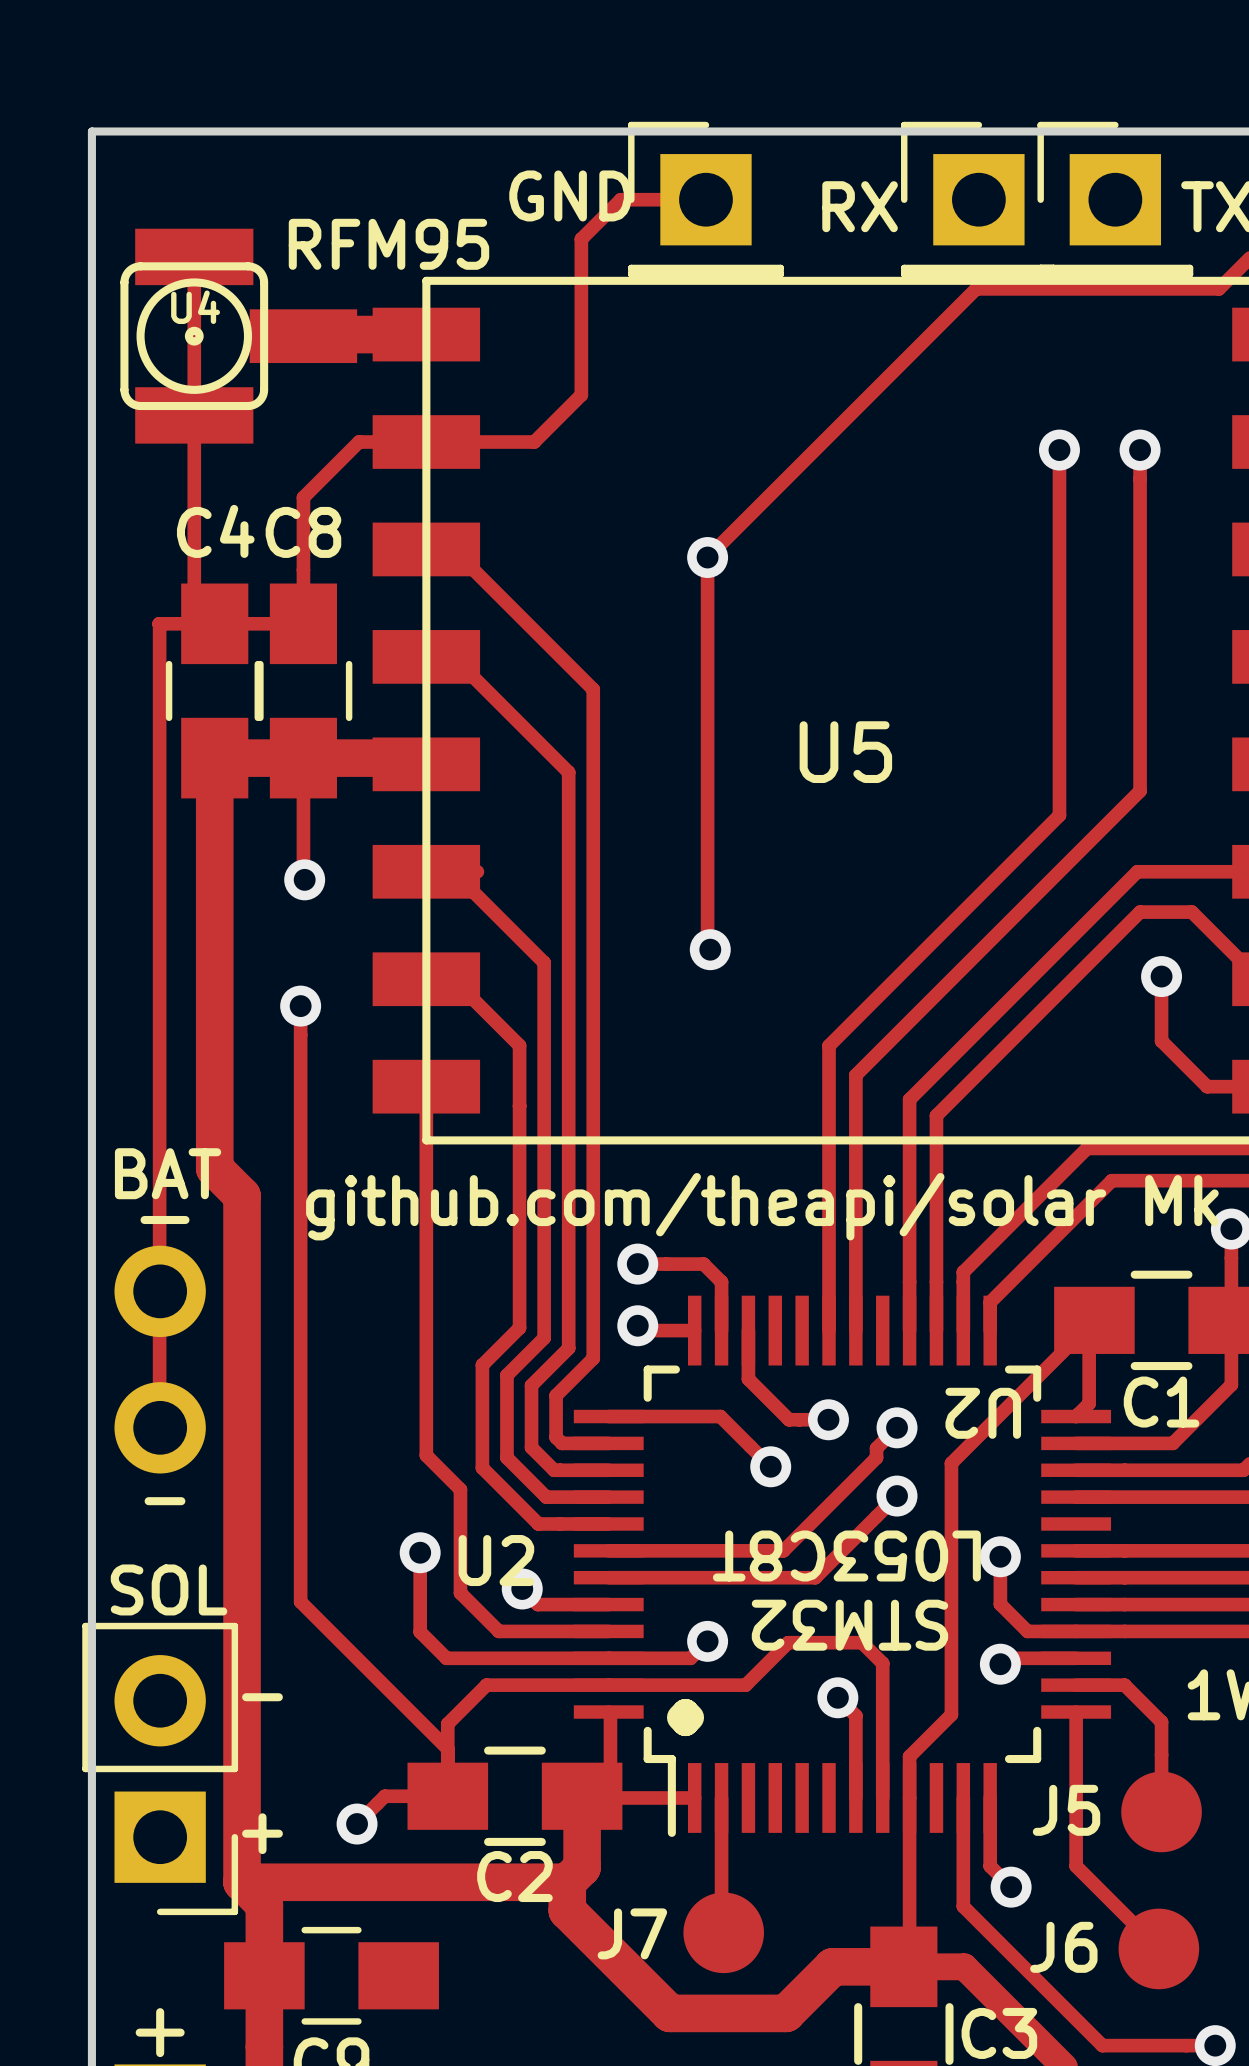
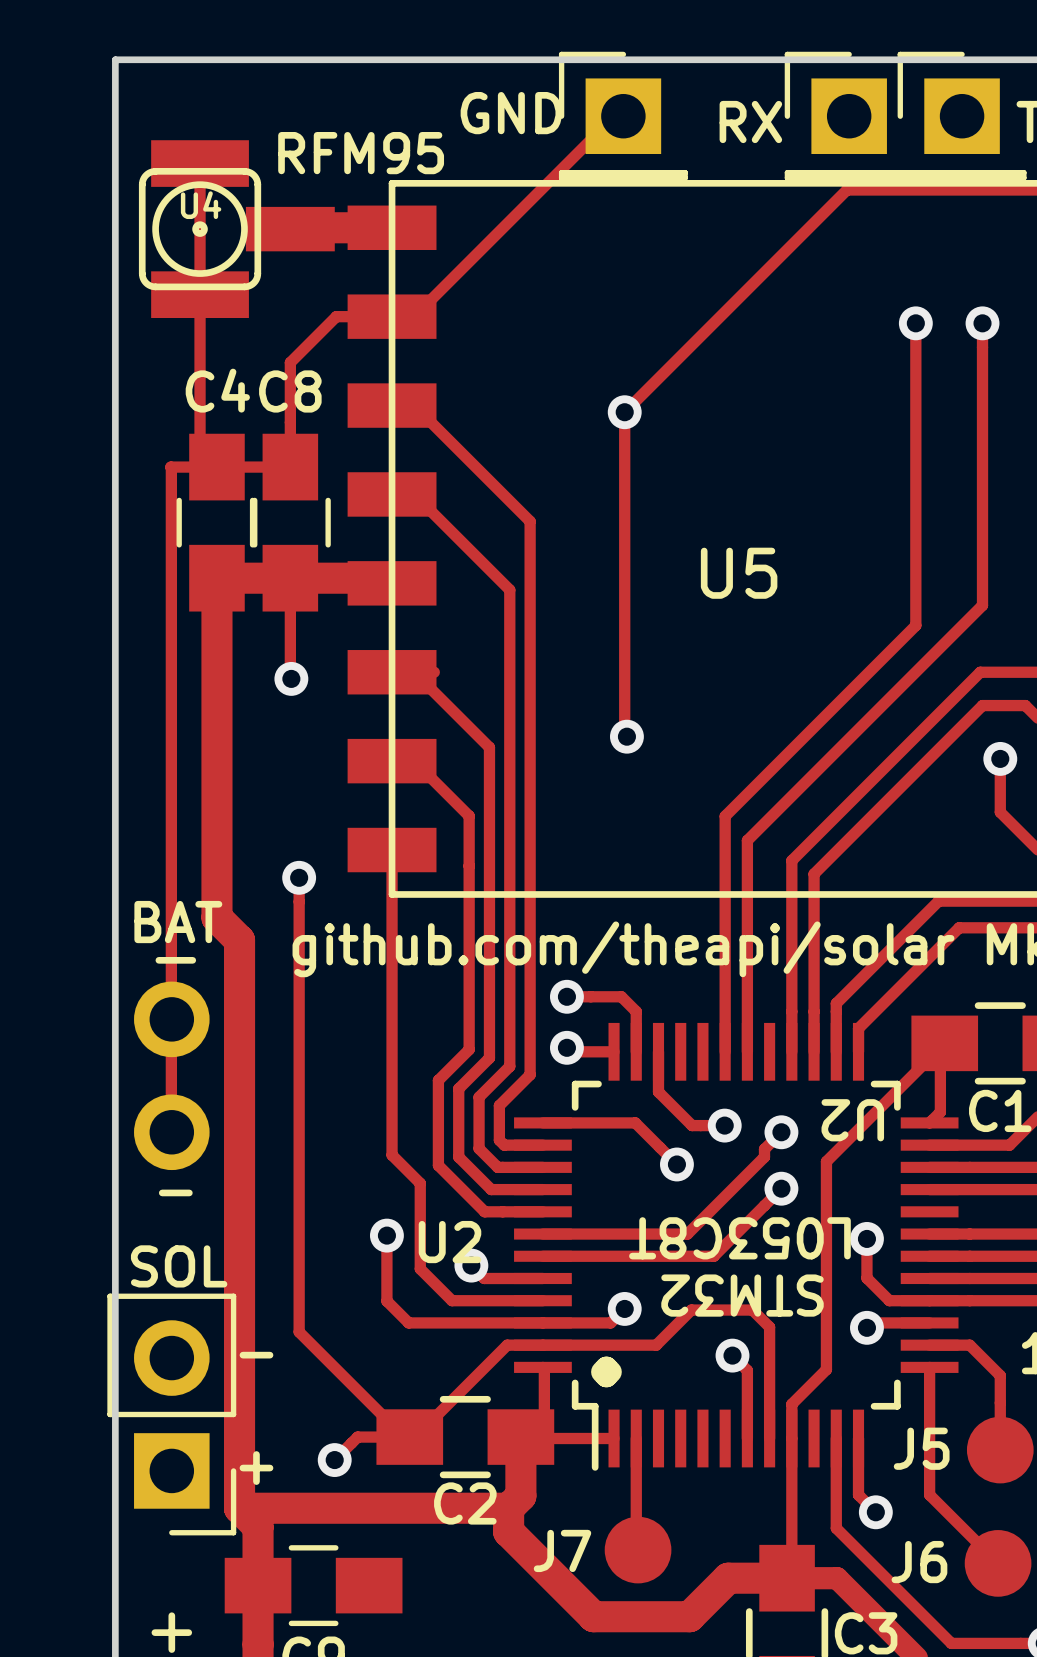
track: (695, 199) (620, 199) (581, 239) (581, 395) (534, 442) (453, 442) -> (614, 116) (414, 316)
track: (300, 1006) (300, 1601) (447, 1749) -> none
via position: (300, 1006) -> (299, 877)
track: none -> (299, 877) (299, 1332) (404, 1437)
track: (565, 1685) (486, 1685) (447, 1723) (447, 1796) -> (507, 1345) (415, 1437) (409, 1437)

